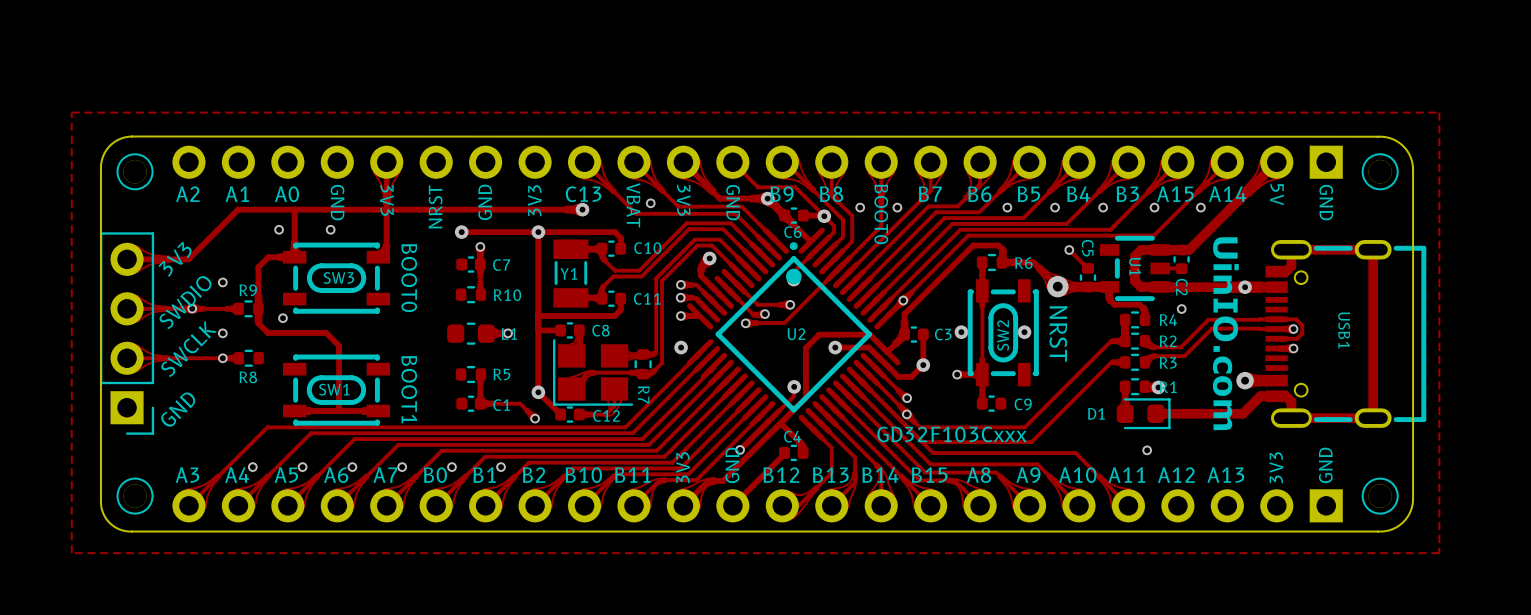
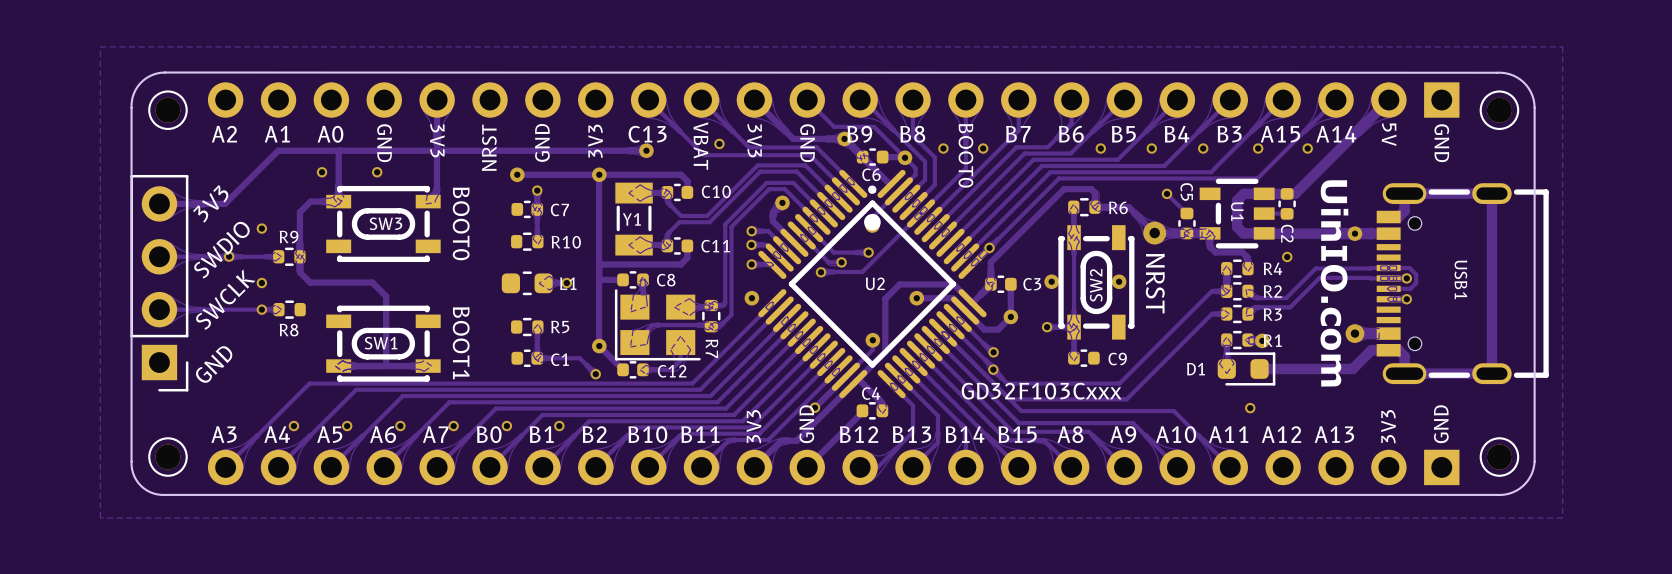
via: (282, 318) -> none

